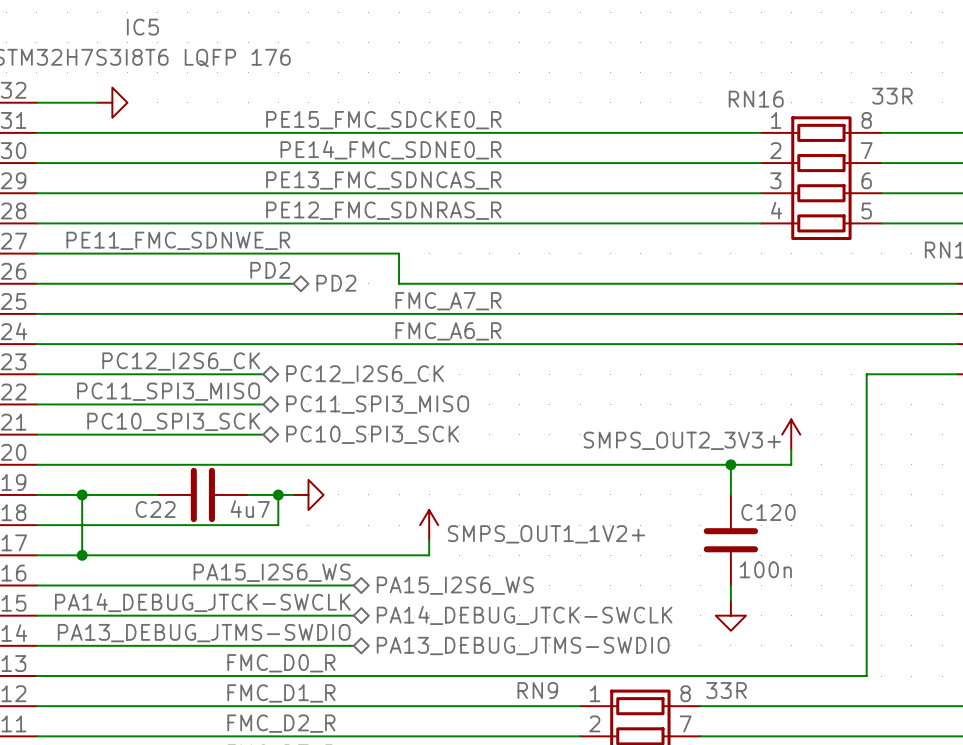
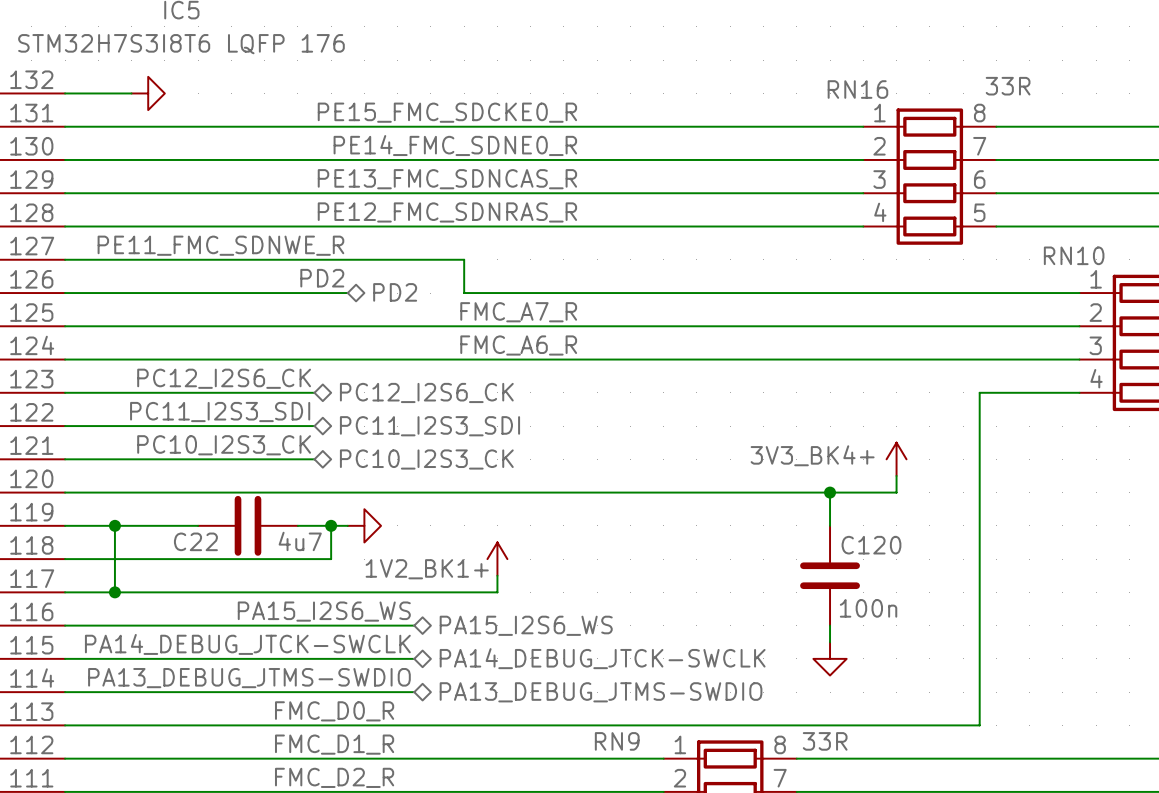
label: PC11_SPI3_MISO (168, 391) -> PC11_I2S3_SDI (220, 412)
hierarchical label: PC11_SPI3_MISO (377, 404) -> PC11_I2S3_SDI (429, 426)
label: PC10_SPI3_SCK (173, 421) -> PC10_I2S3_CK (224, 445)
hierarchical label: PC10_SPI3_SCK (372, 434) -> PC10_I2S3_CK (426, 459)
power symbol: SMPS_OUT2_3V3+ (791, 434) -> 3V3_BK4+ (896, 459)
power symbol: SMPS_OUT1_1V2+ (429, 525) -> 1V2_BK1+ (497, 559)

